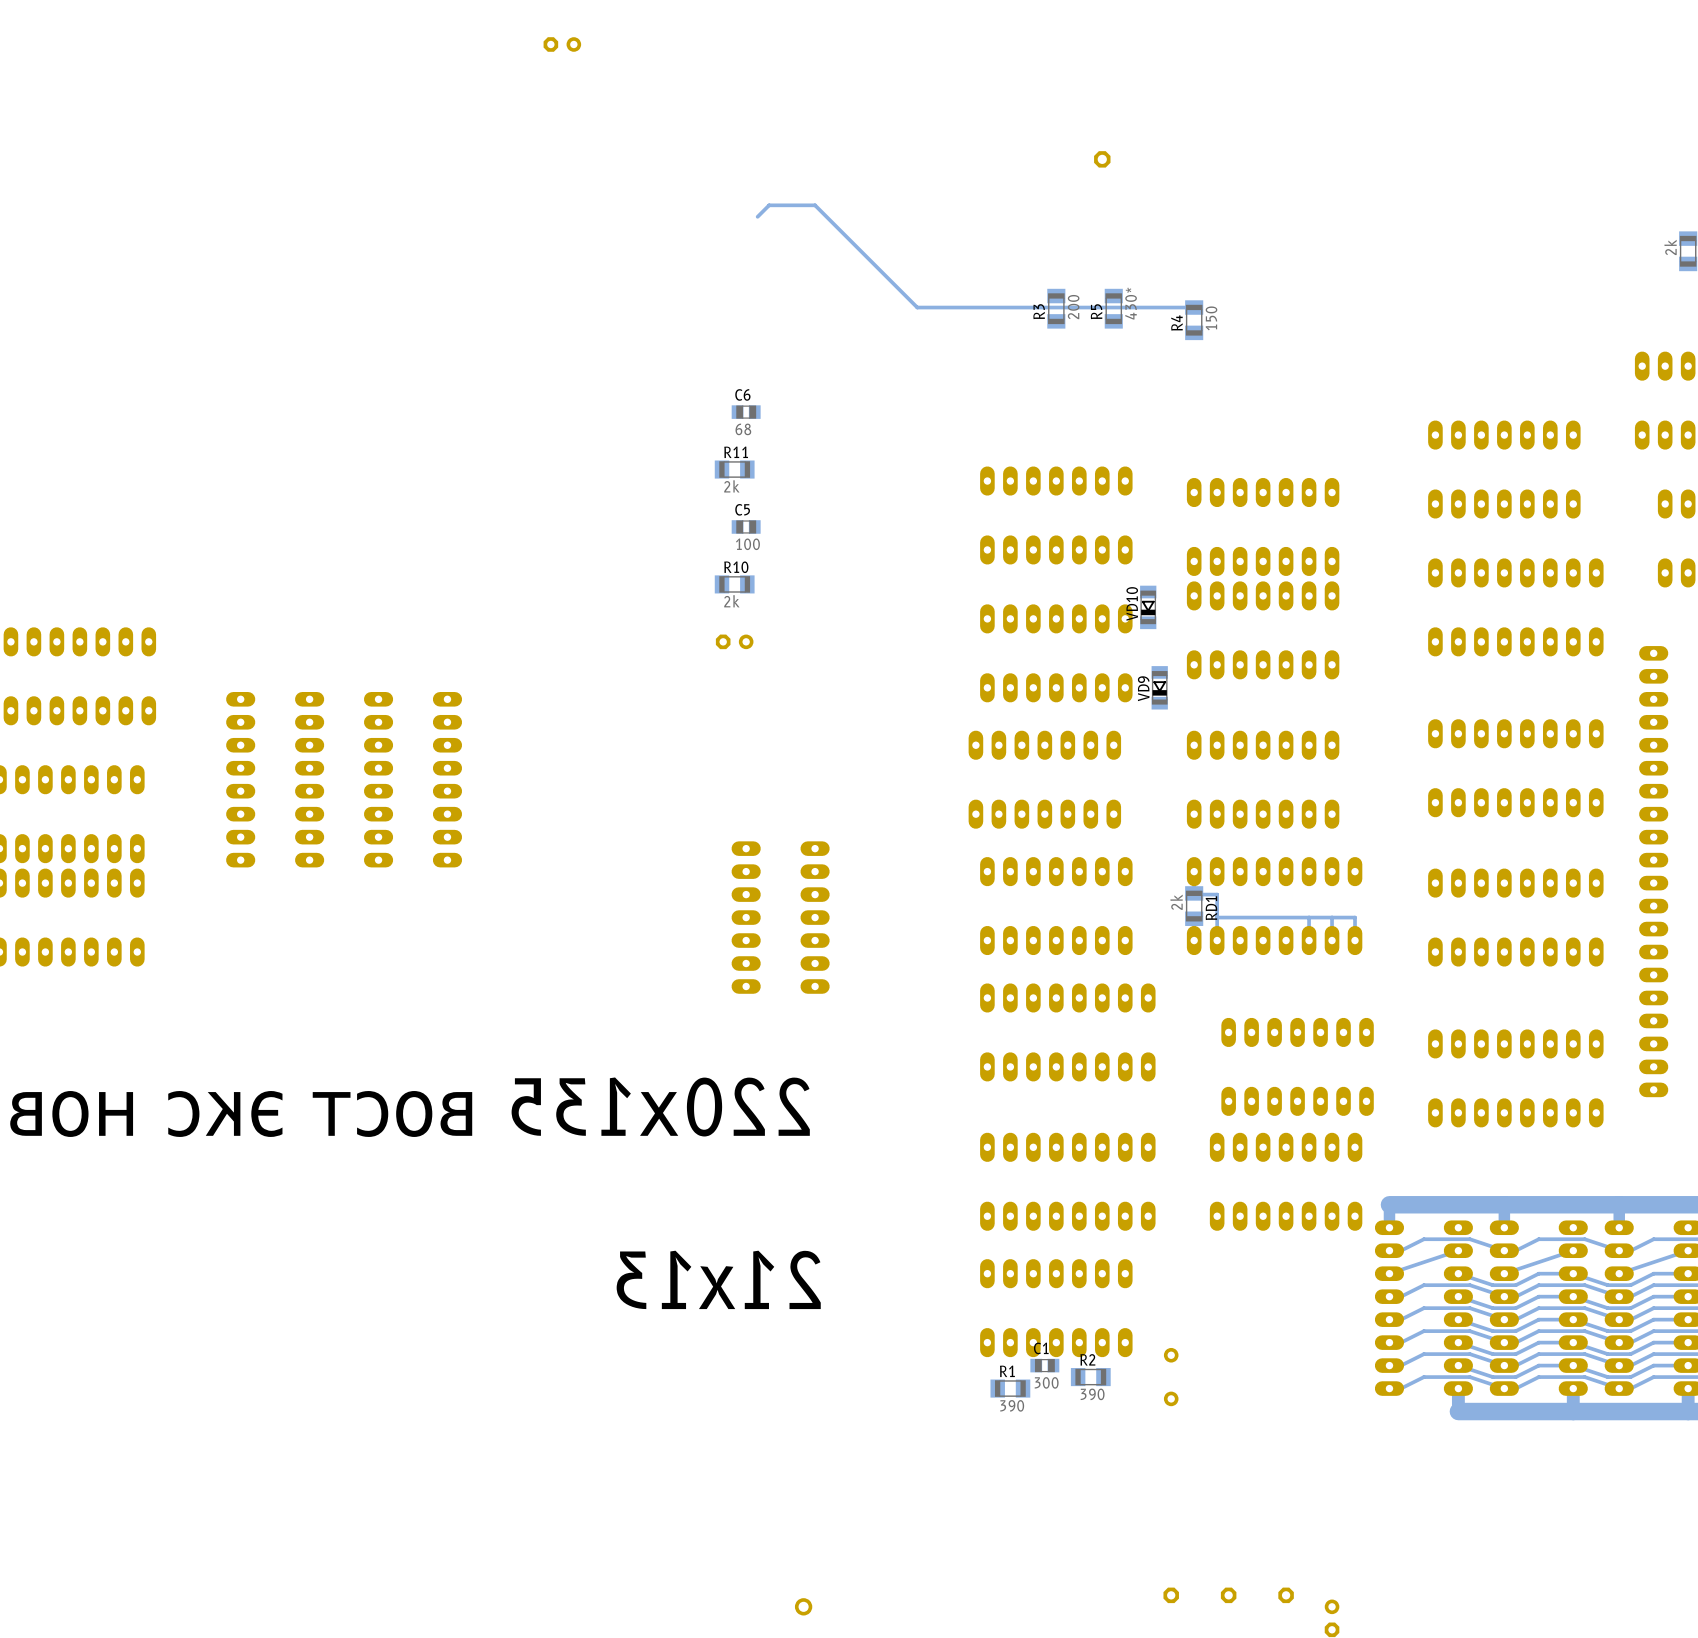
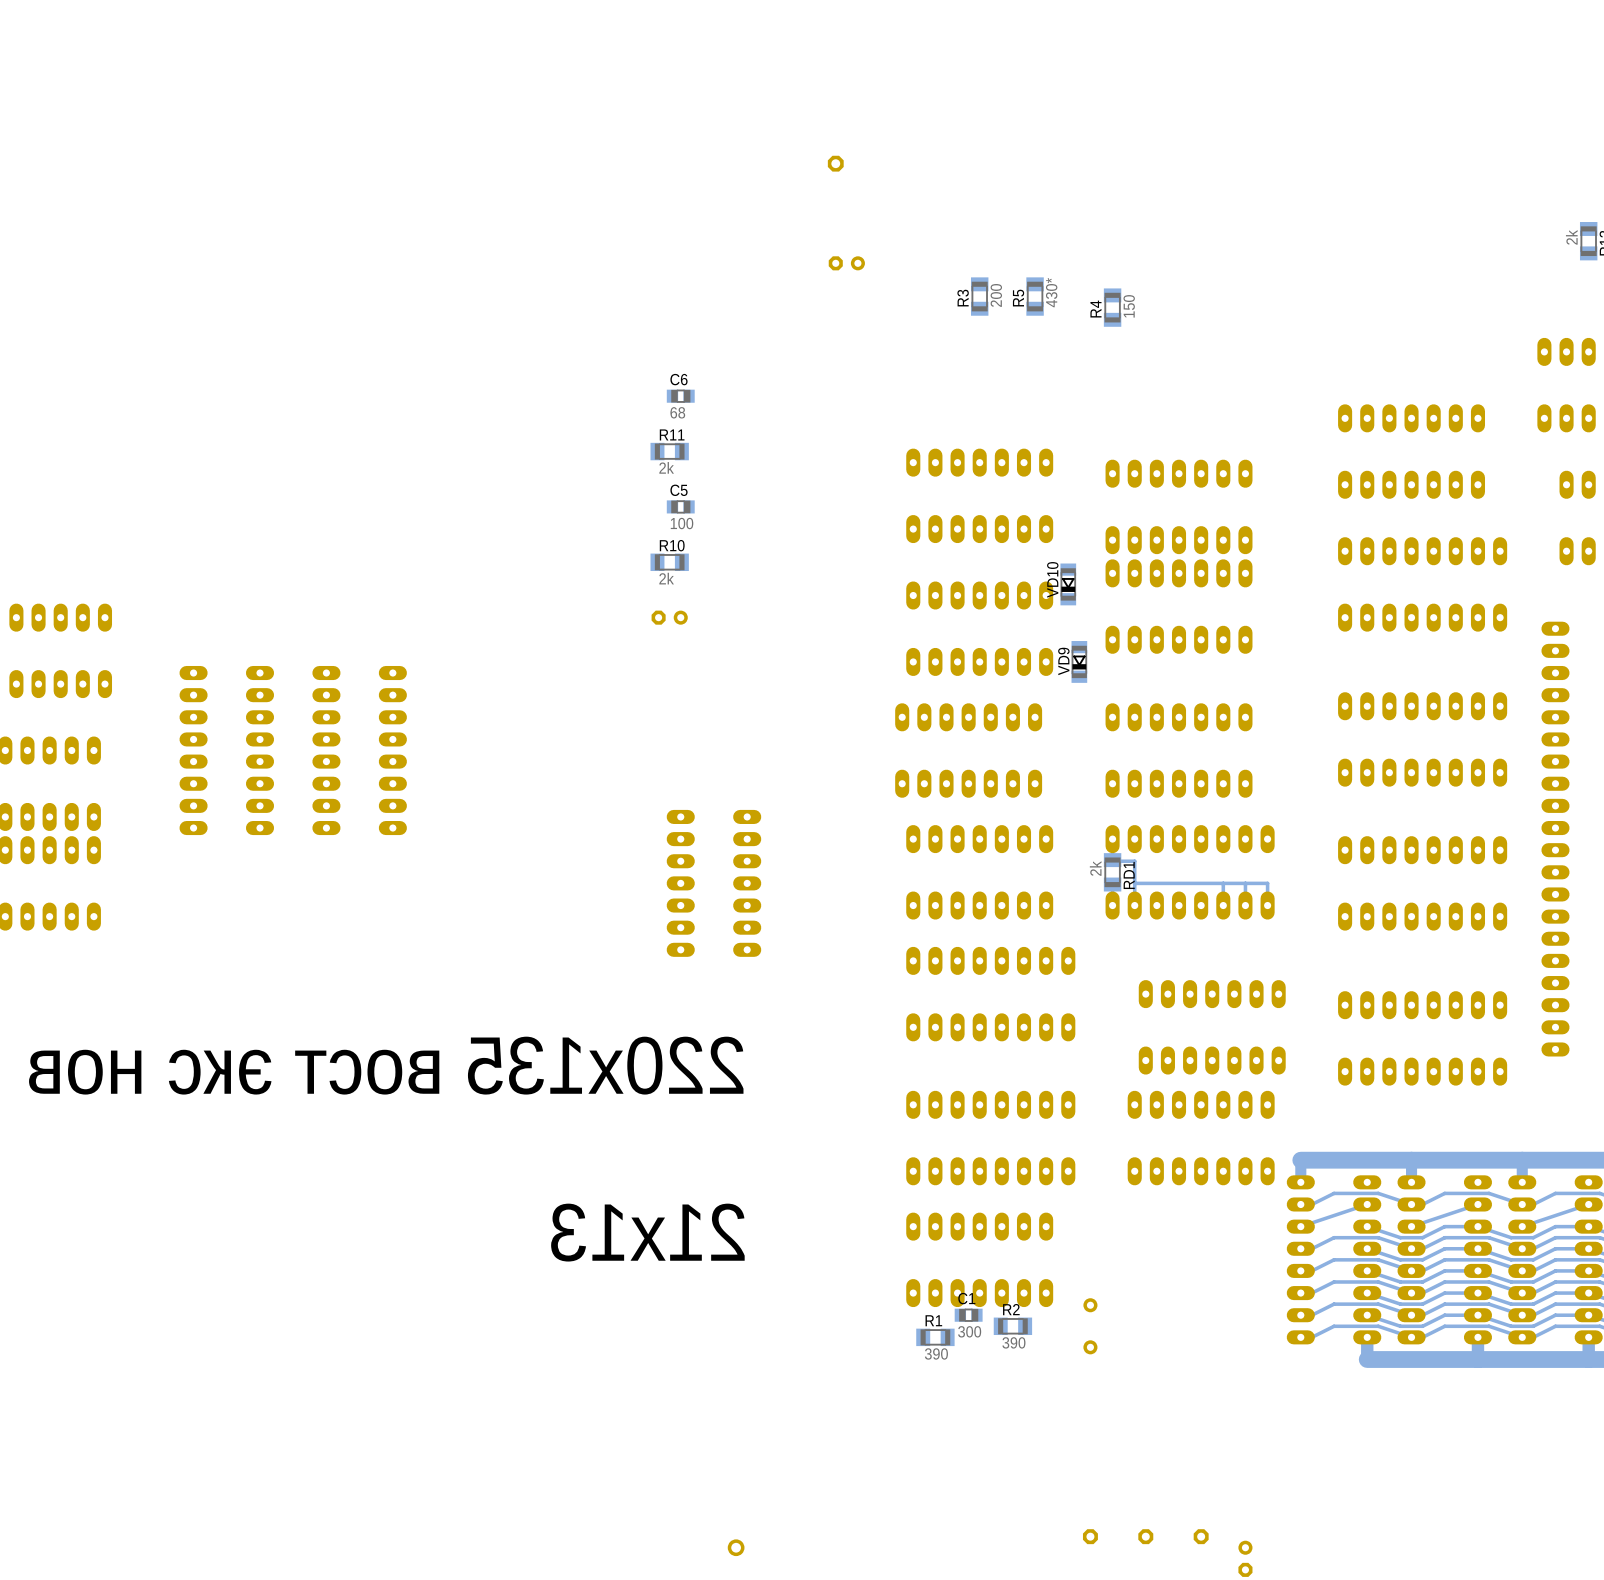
part: (562, 44) -> none
part position: (1102, 159) -> (835, 163)
track: (757, 216) (769, 205) (815, 205) (917, 307) (1194, 307) -> none
part: none -> (846, 263)

